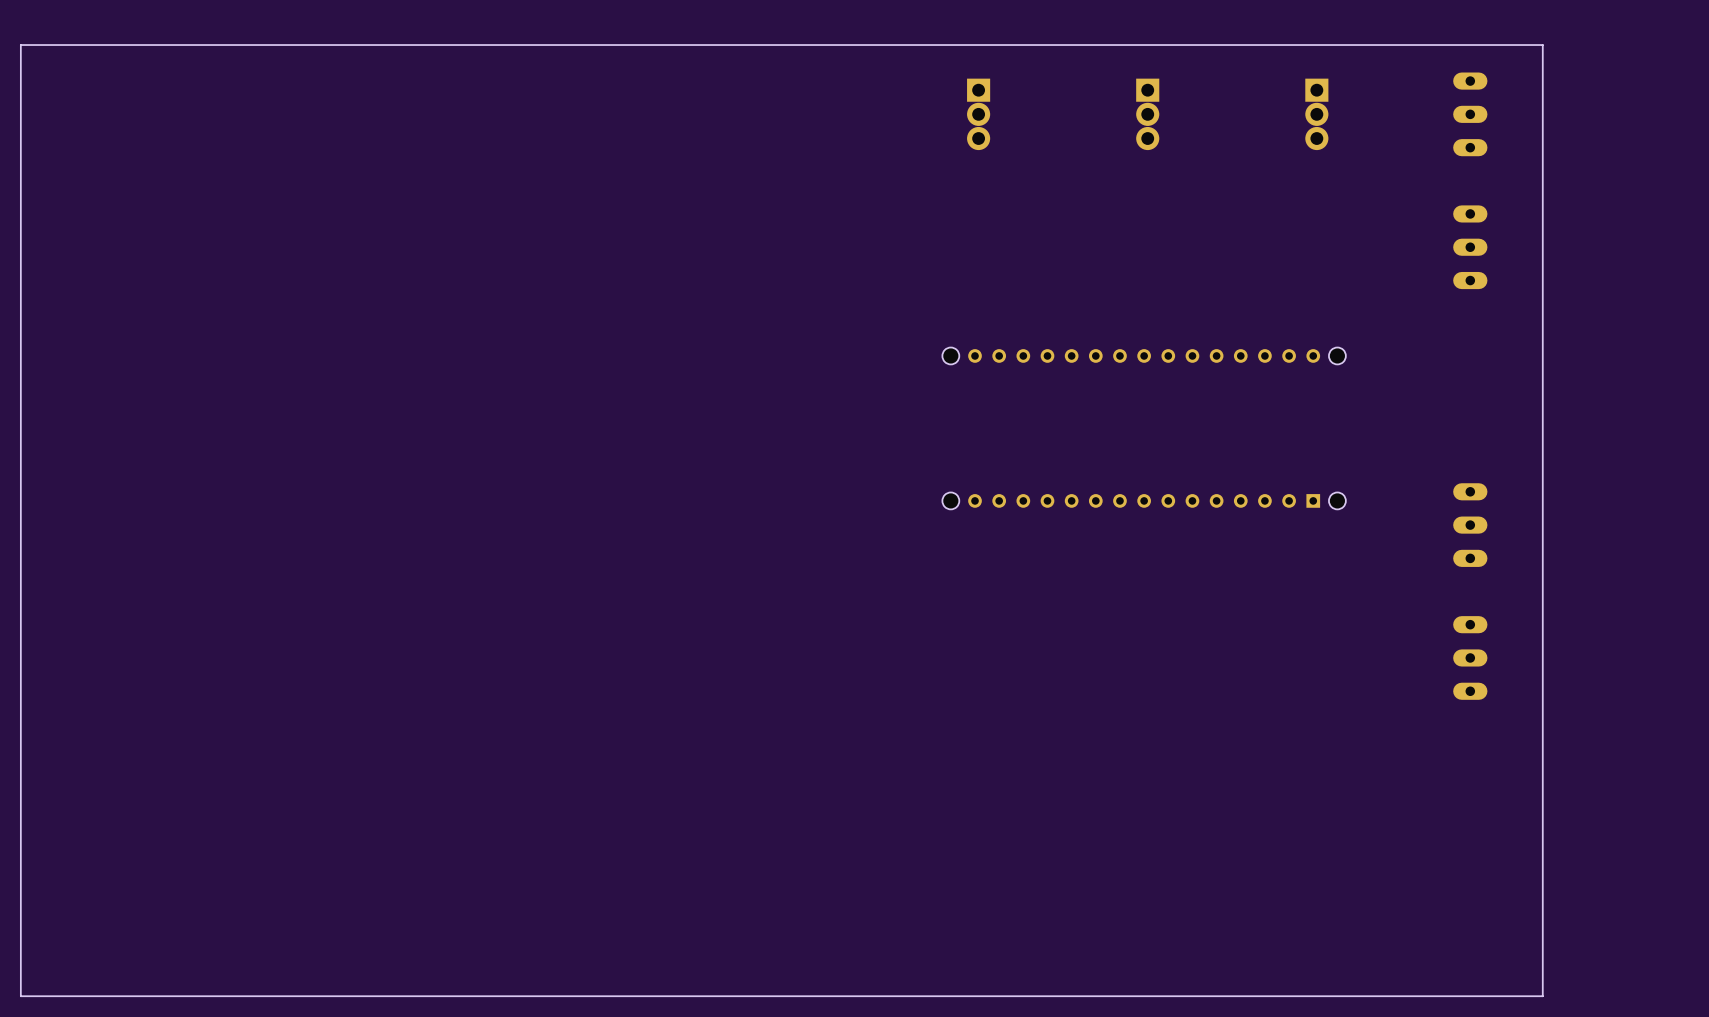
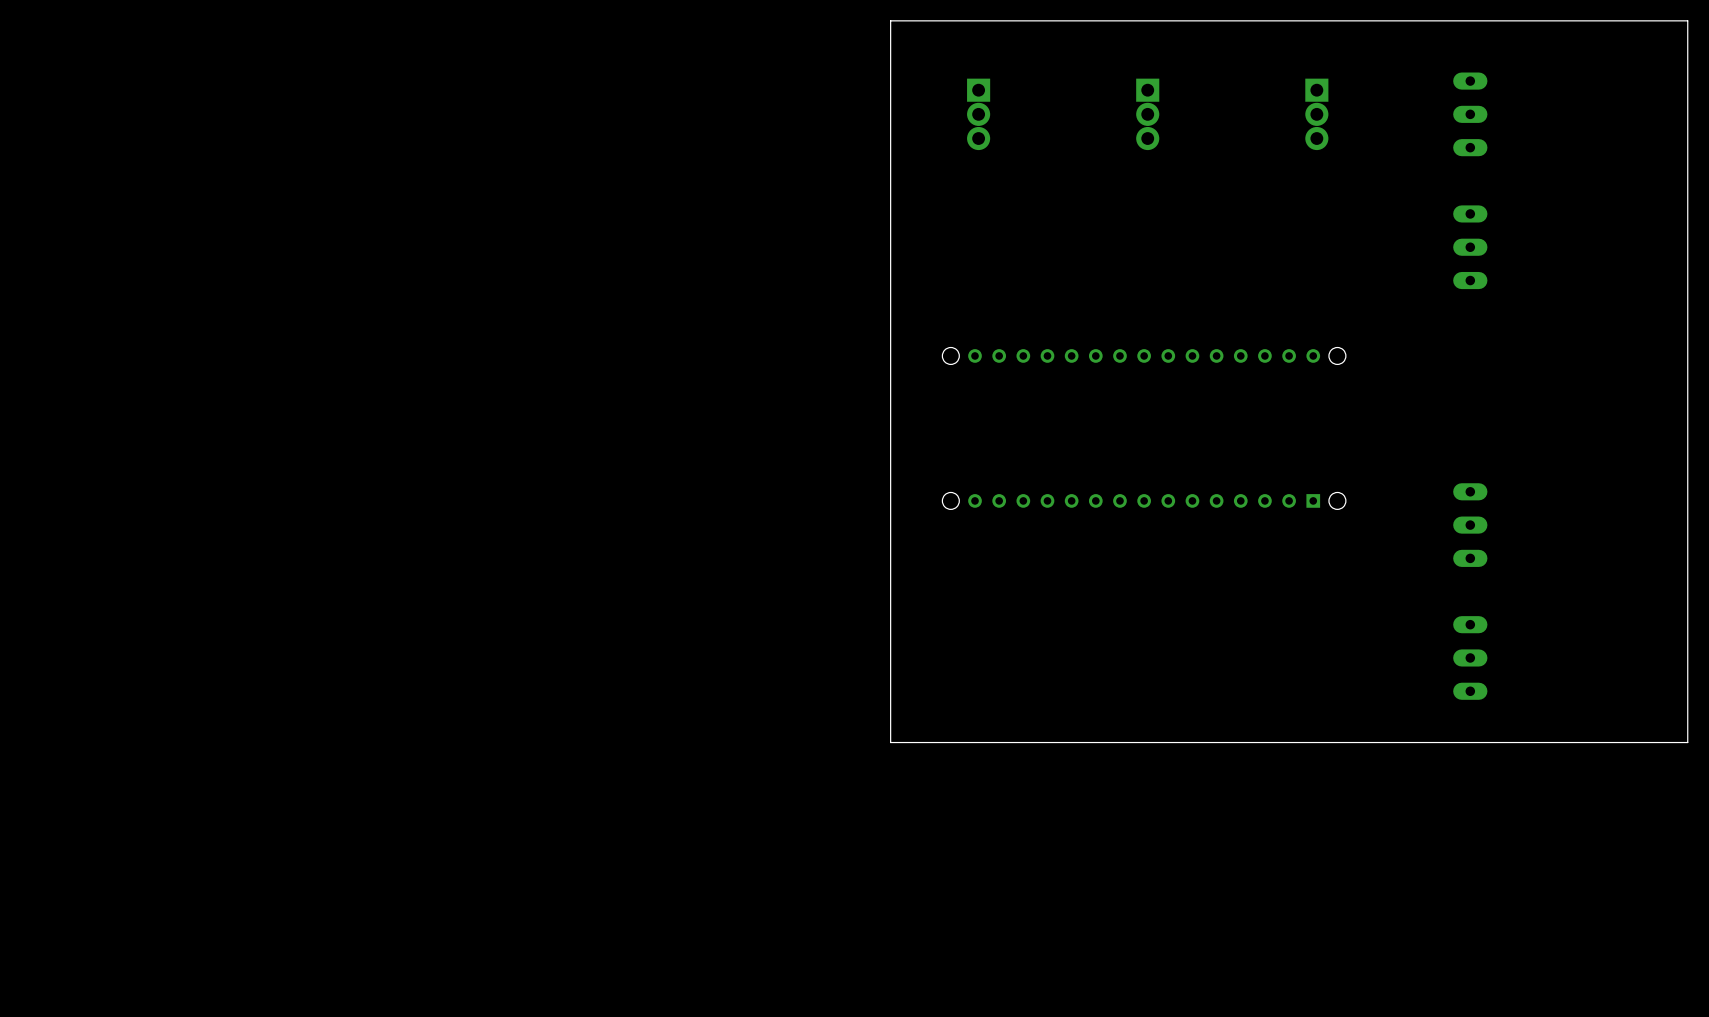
board edge: none -> (1687, 20) (890, 20) (890, 742) (1687, 742) (1687, 20)
board edge: (1542, 45) (20, 45) (20, 996) (1542, 996) (1542, 45) -> none

